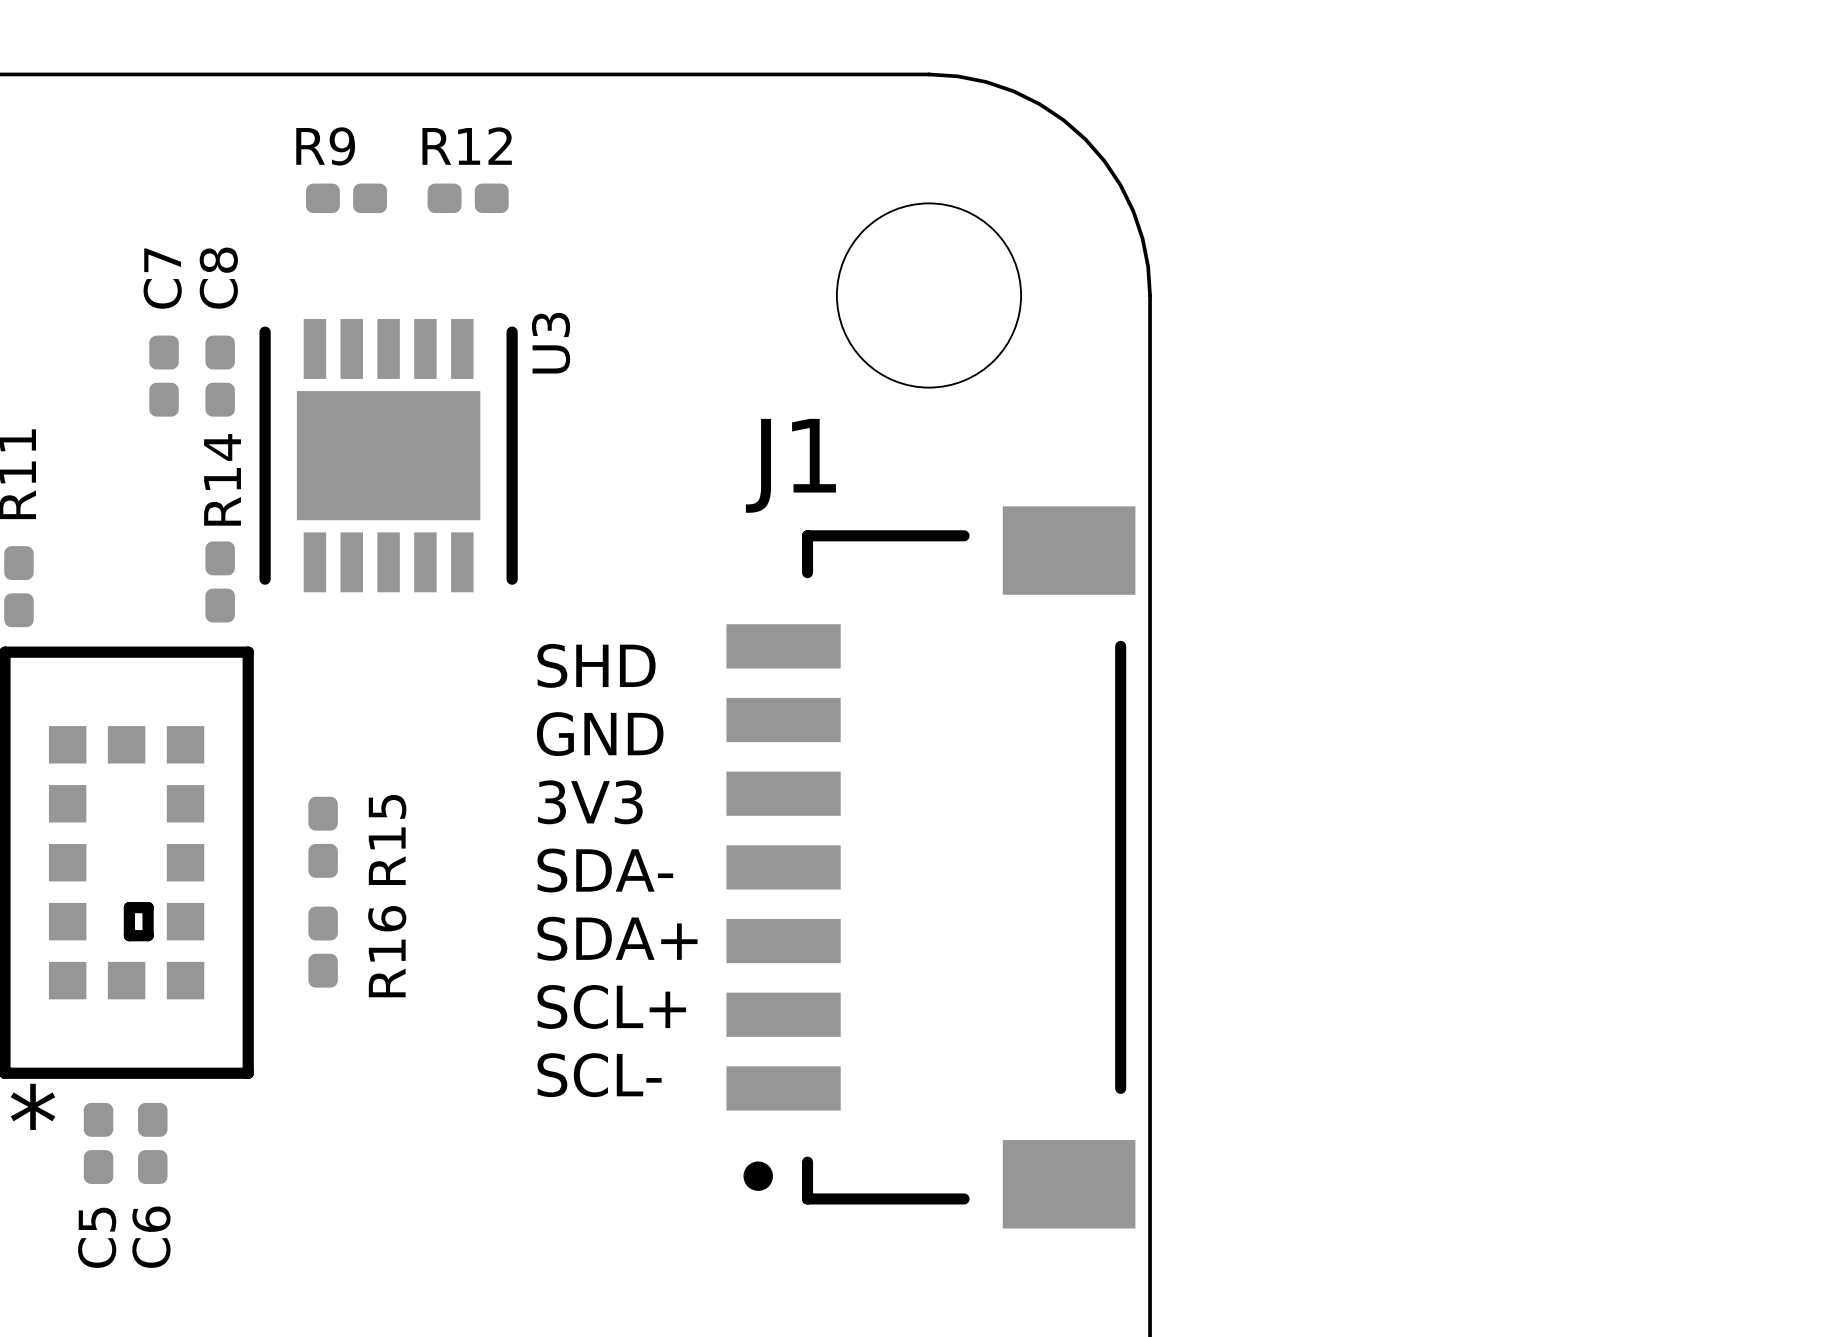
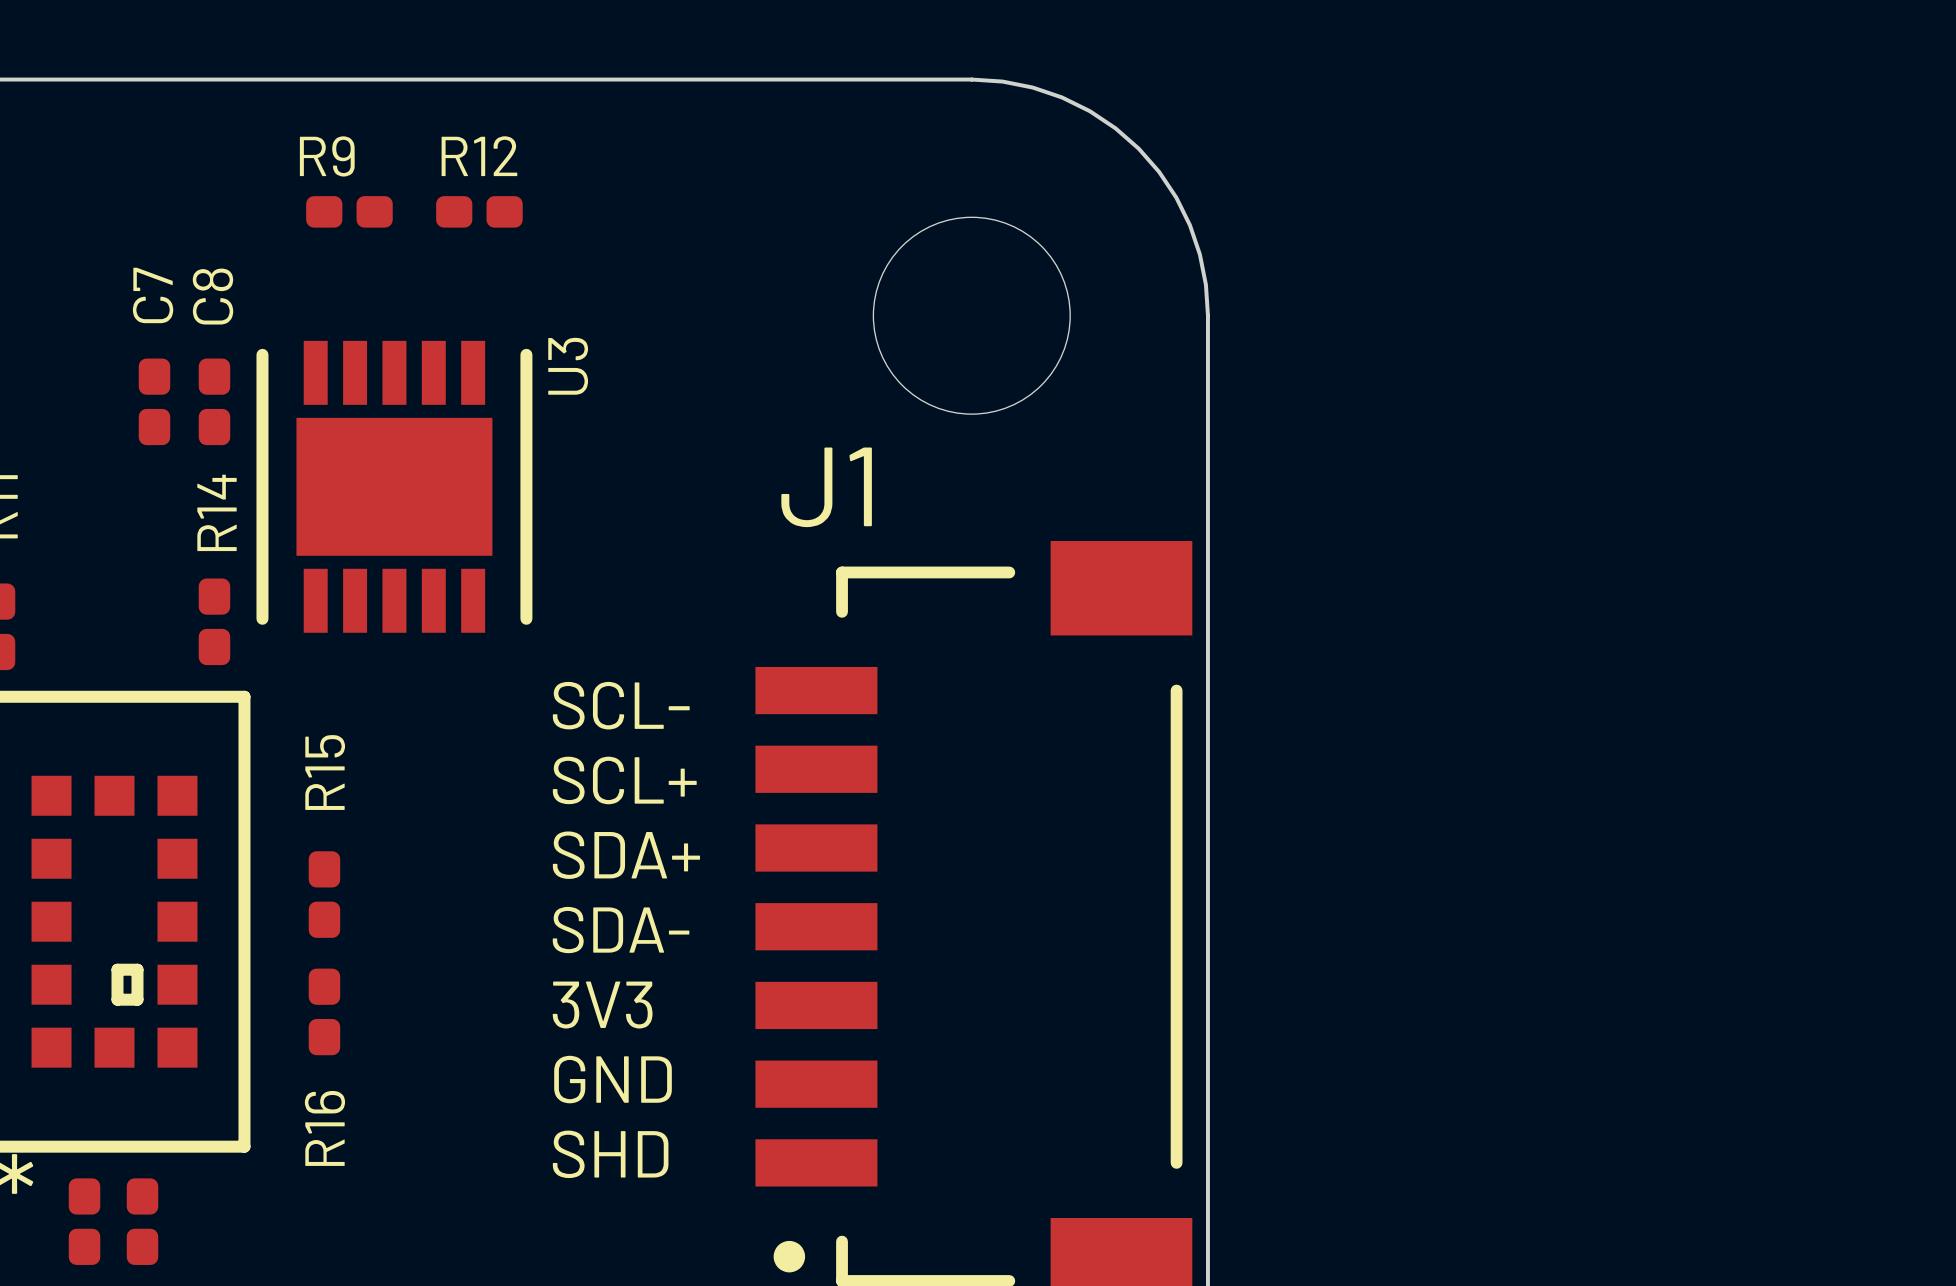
text: SHD (596, 665) -> SCL- (621, 705)
text: GND (600, 734) -> SCL+ (624, 780)
text: 3V3 (590, 802) -> SDA+ (626, 855)
R15 name position: R15 (387, 839) -> R15 (325, 772)
text: SDA+ (617, 938) -> 3V3 (602, 1005)
R16 name position: R16 (387, 951) -> R16 (324, 1128)
text: SCL+ (611, 1006) -> GND (613, 1079)
text: SCL- (599, 1075) -> SHD (610, 1154)

